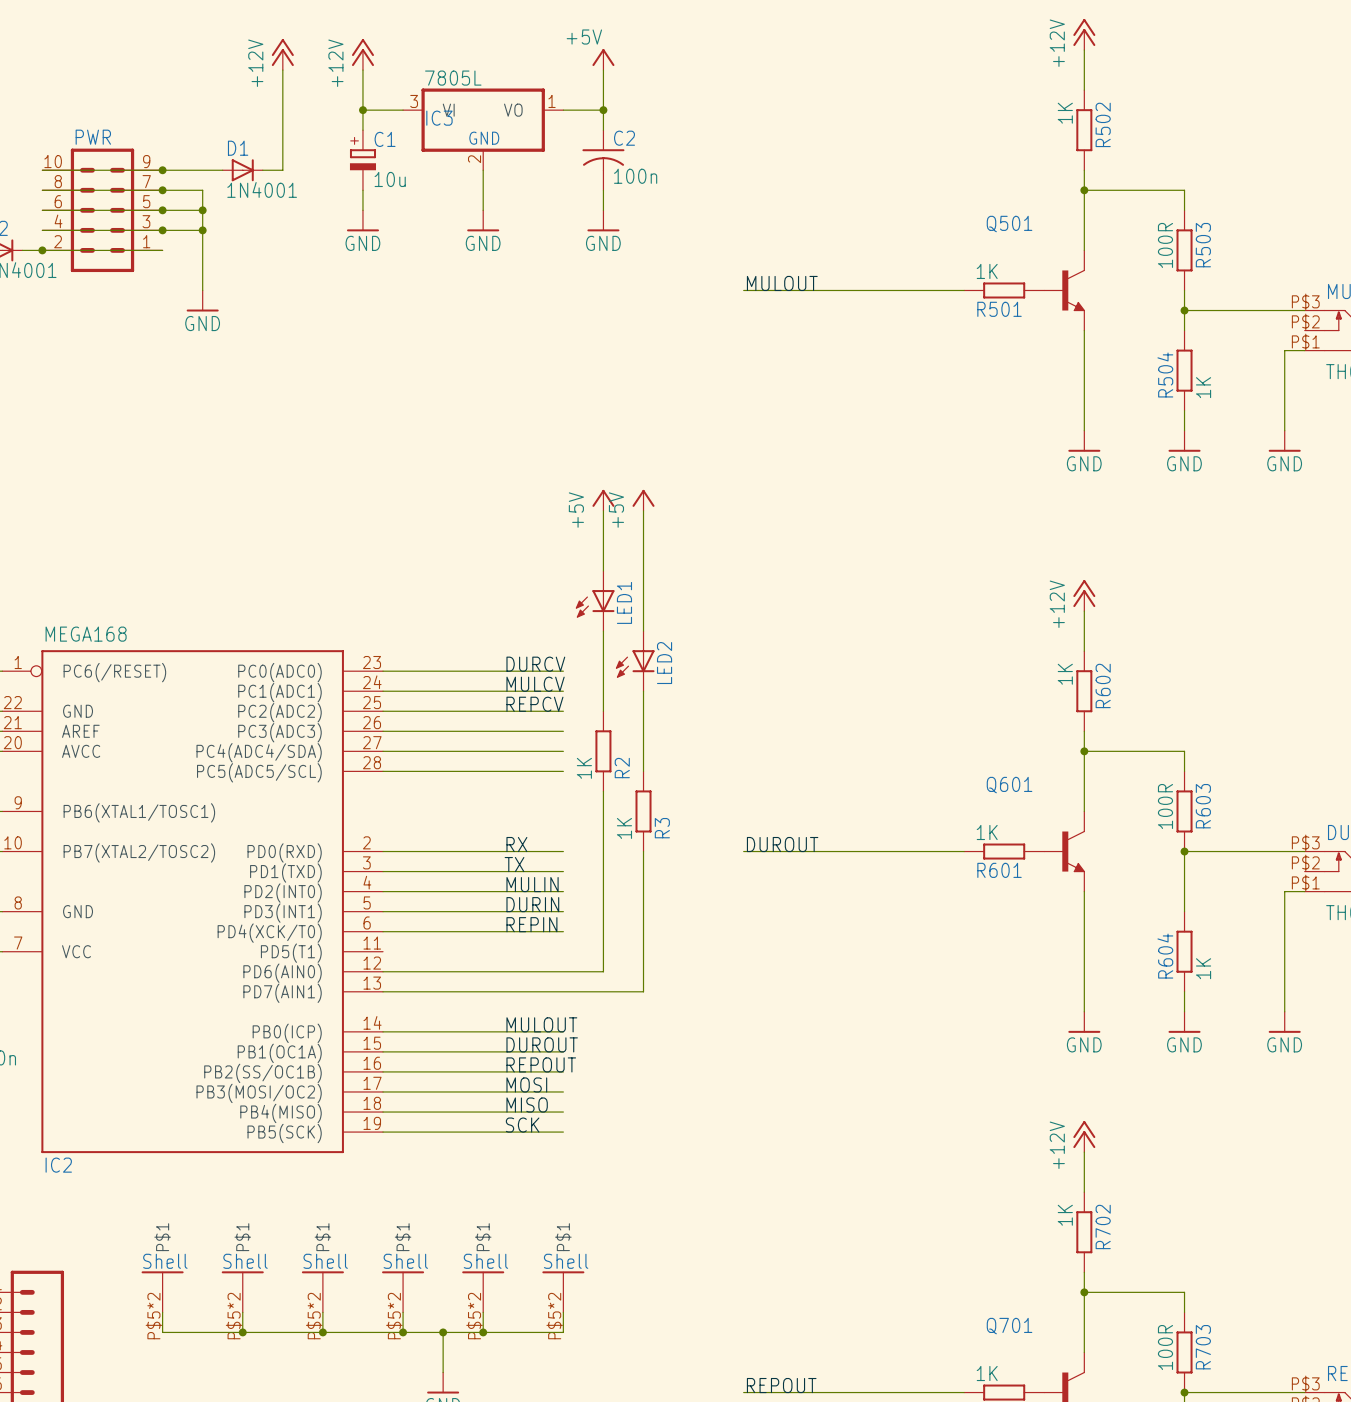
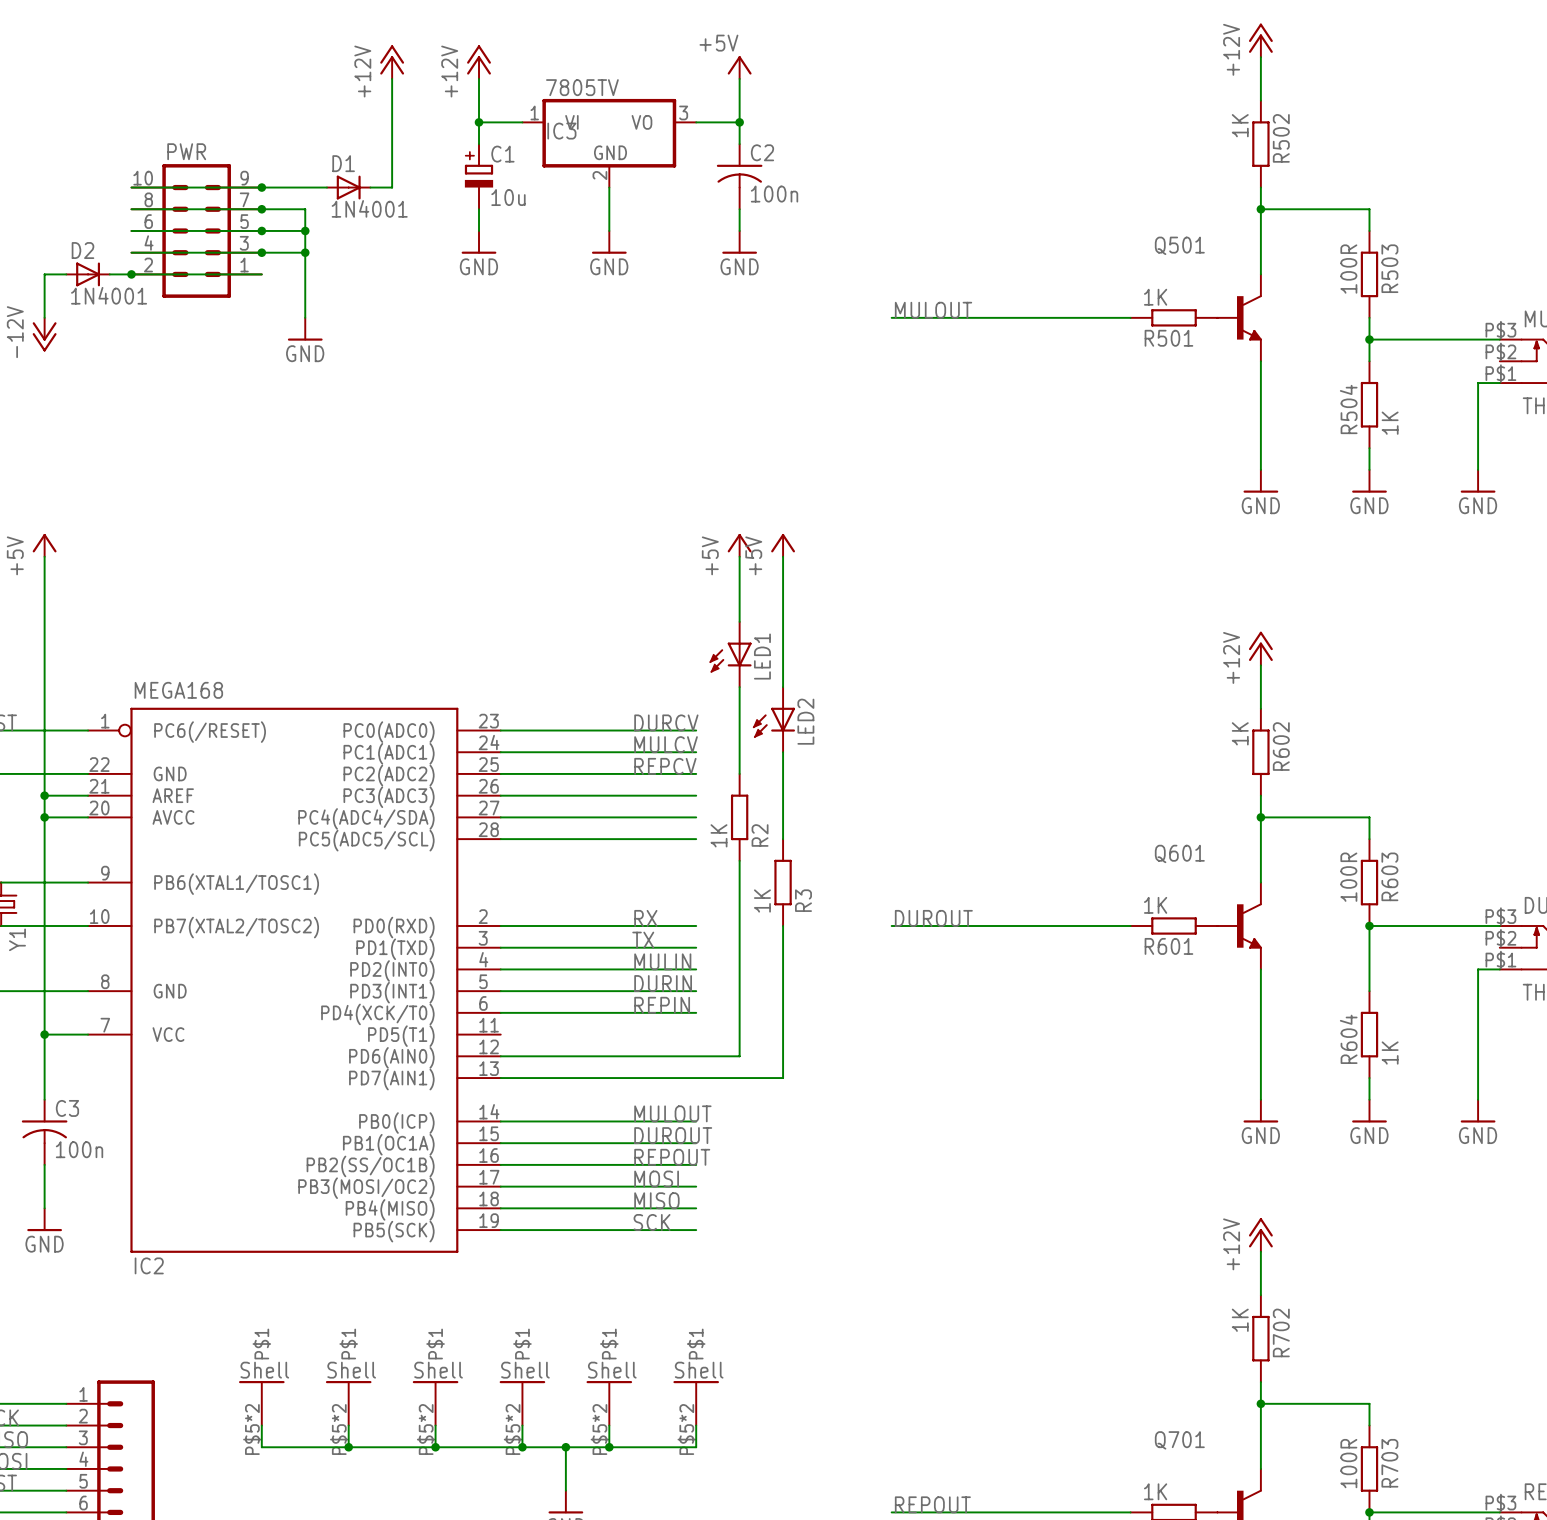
IC3 value: 7805L (453, 78) -> 7805TV (582, 87)
IC3 pin number: 3 (414, 101) -> 1 (534, 112)
IC3 pin number: 1 (552, 101) -> 3 (683, 112)

